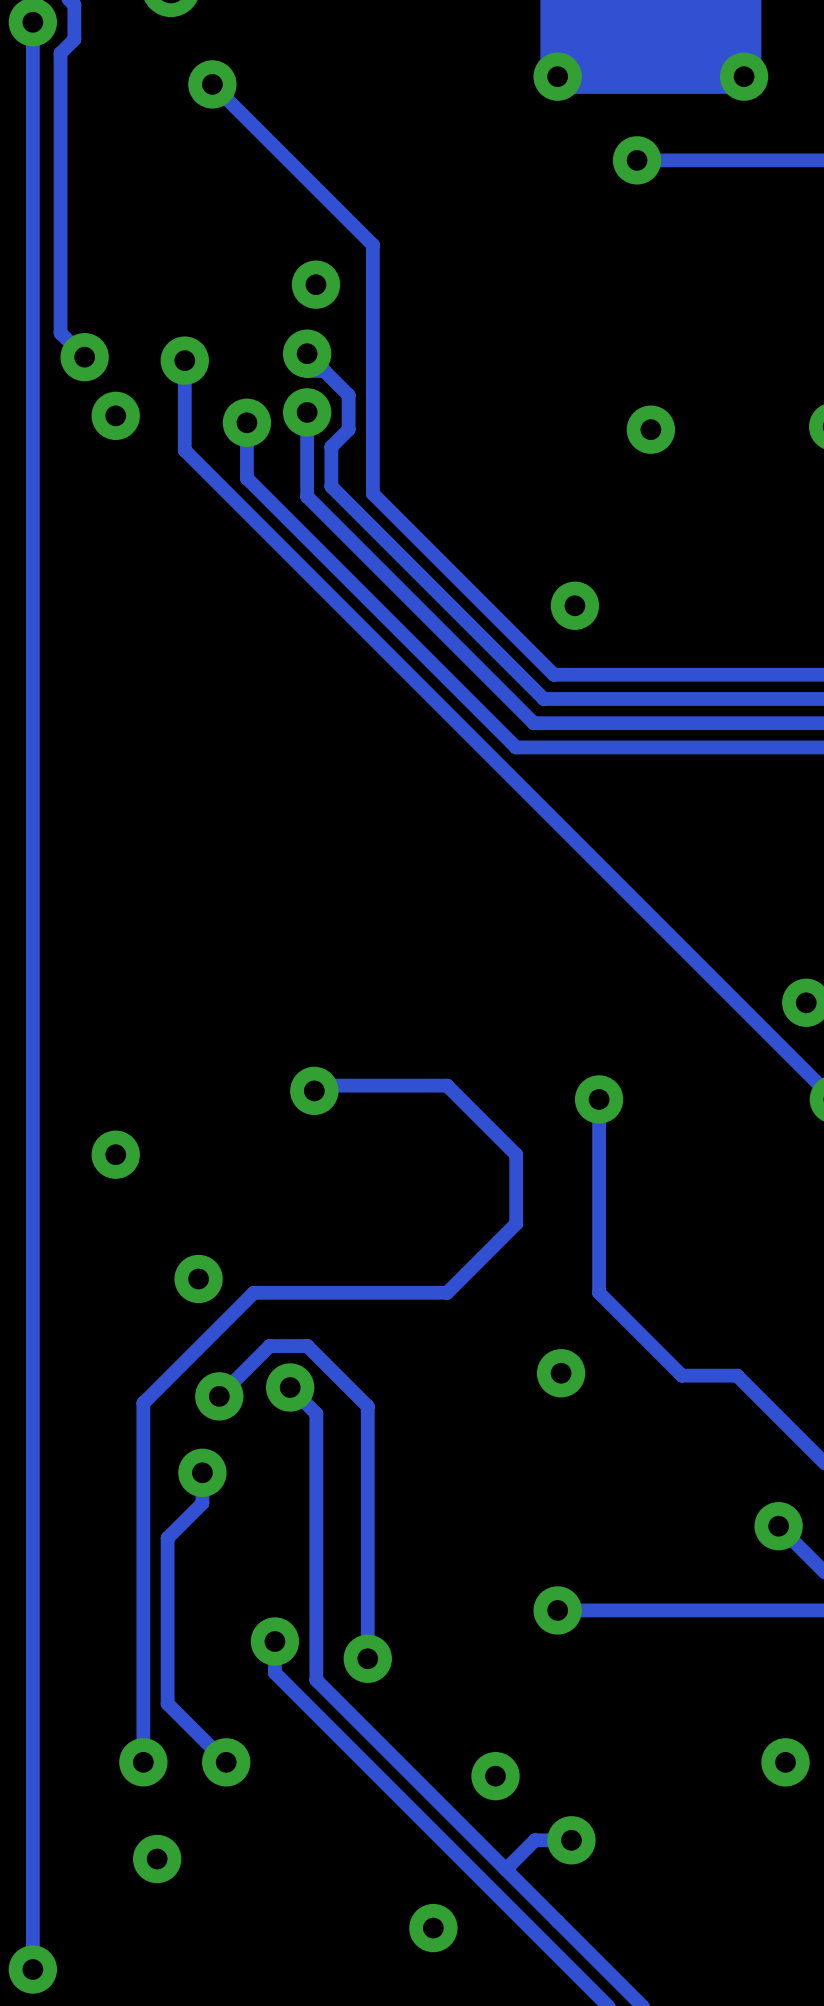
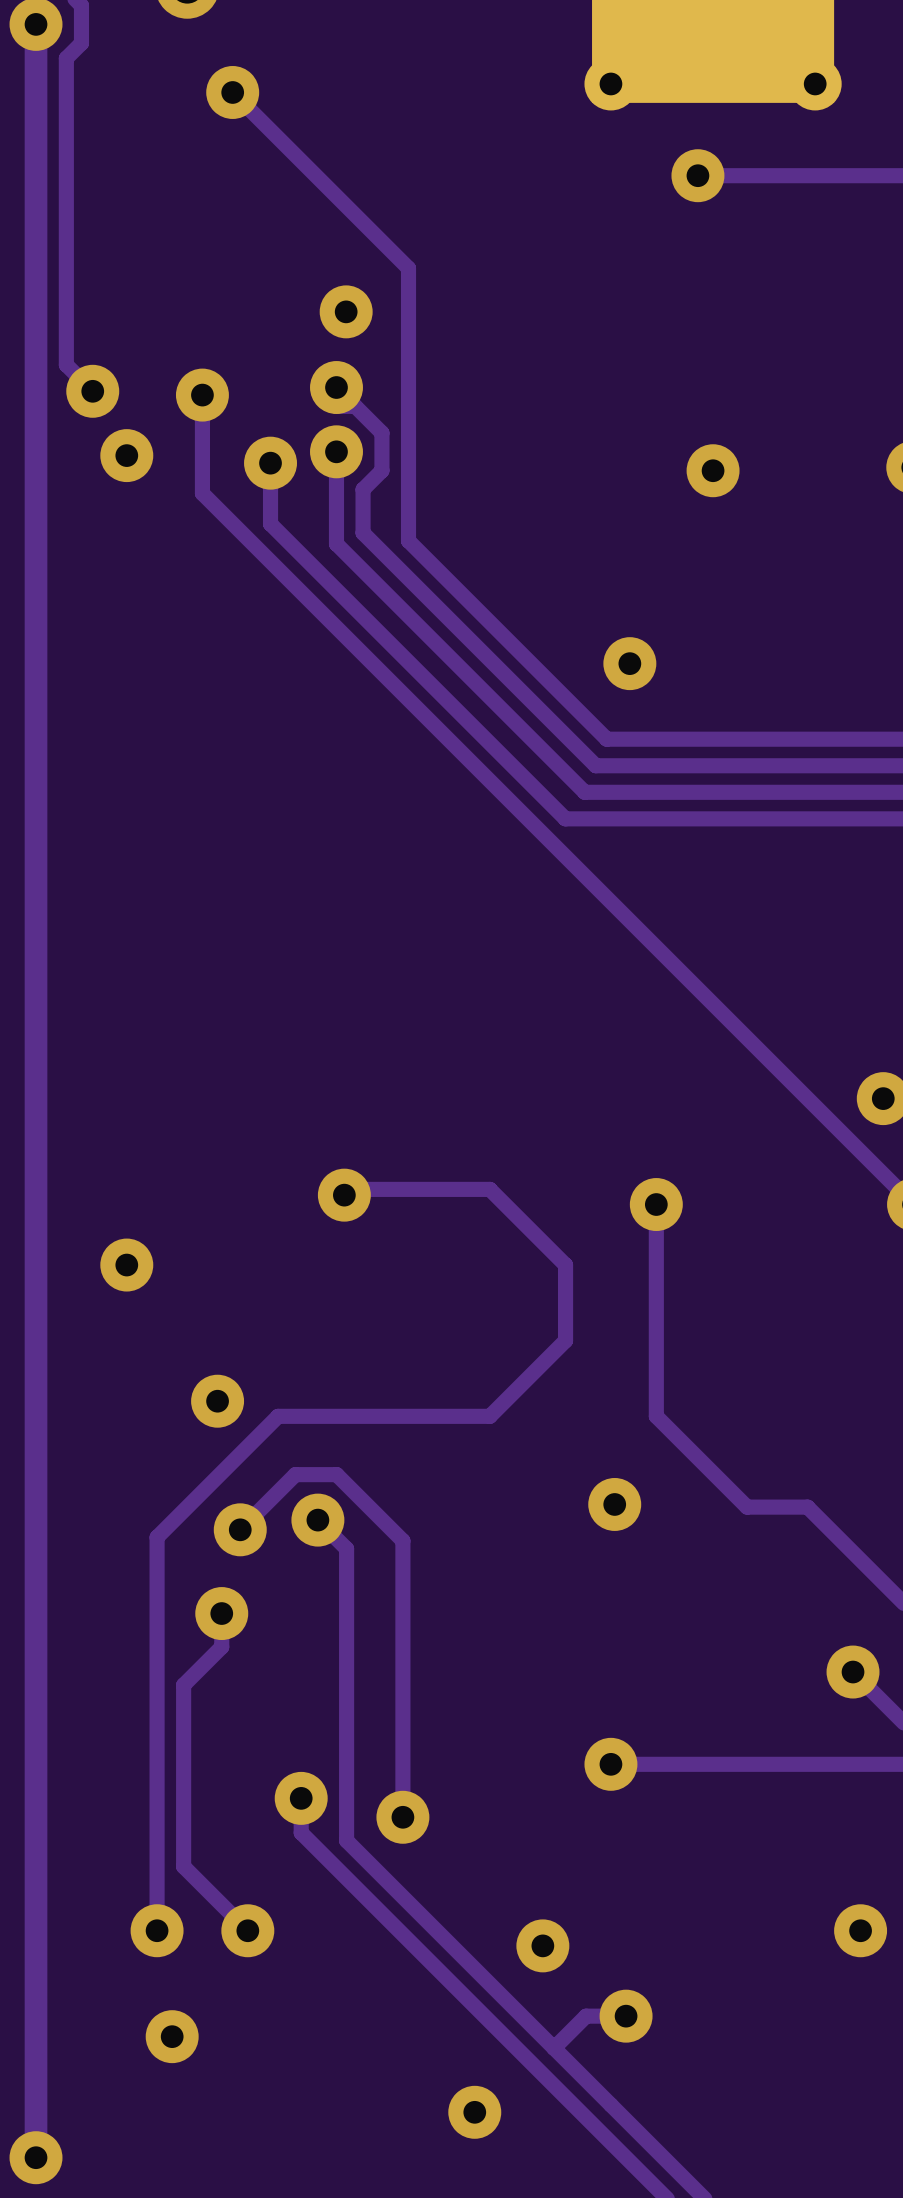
track width: thin (32, 22) (32, 1983) -> thick (36, 24) (36, 2172)

